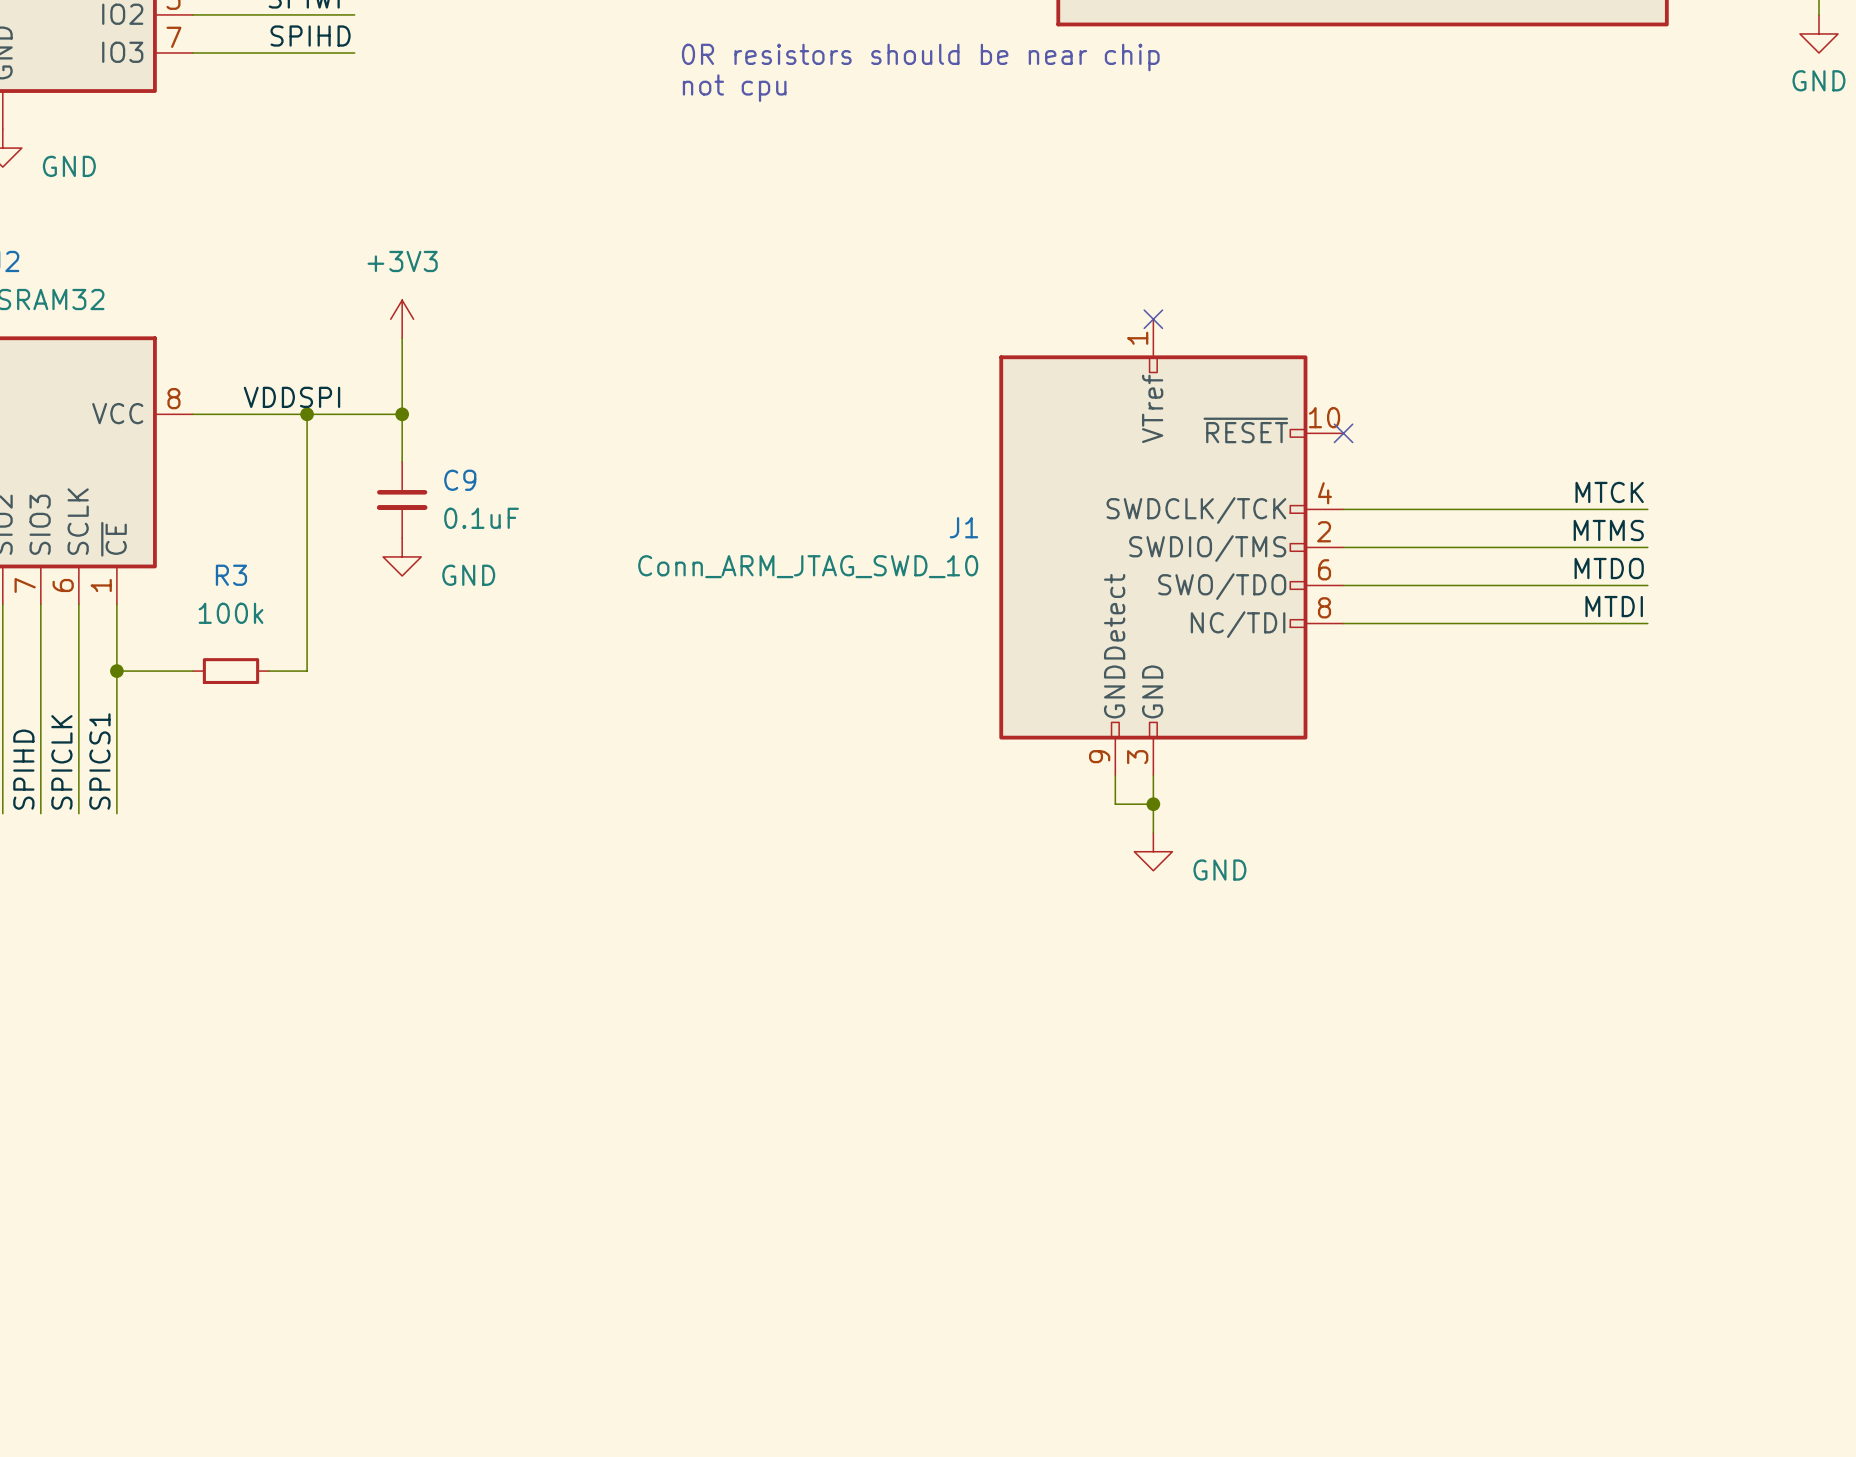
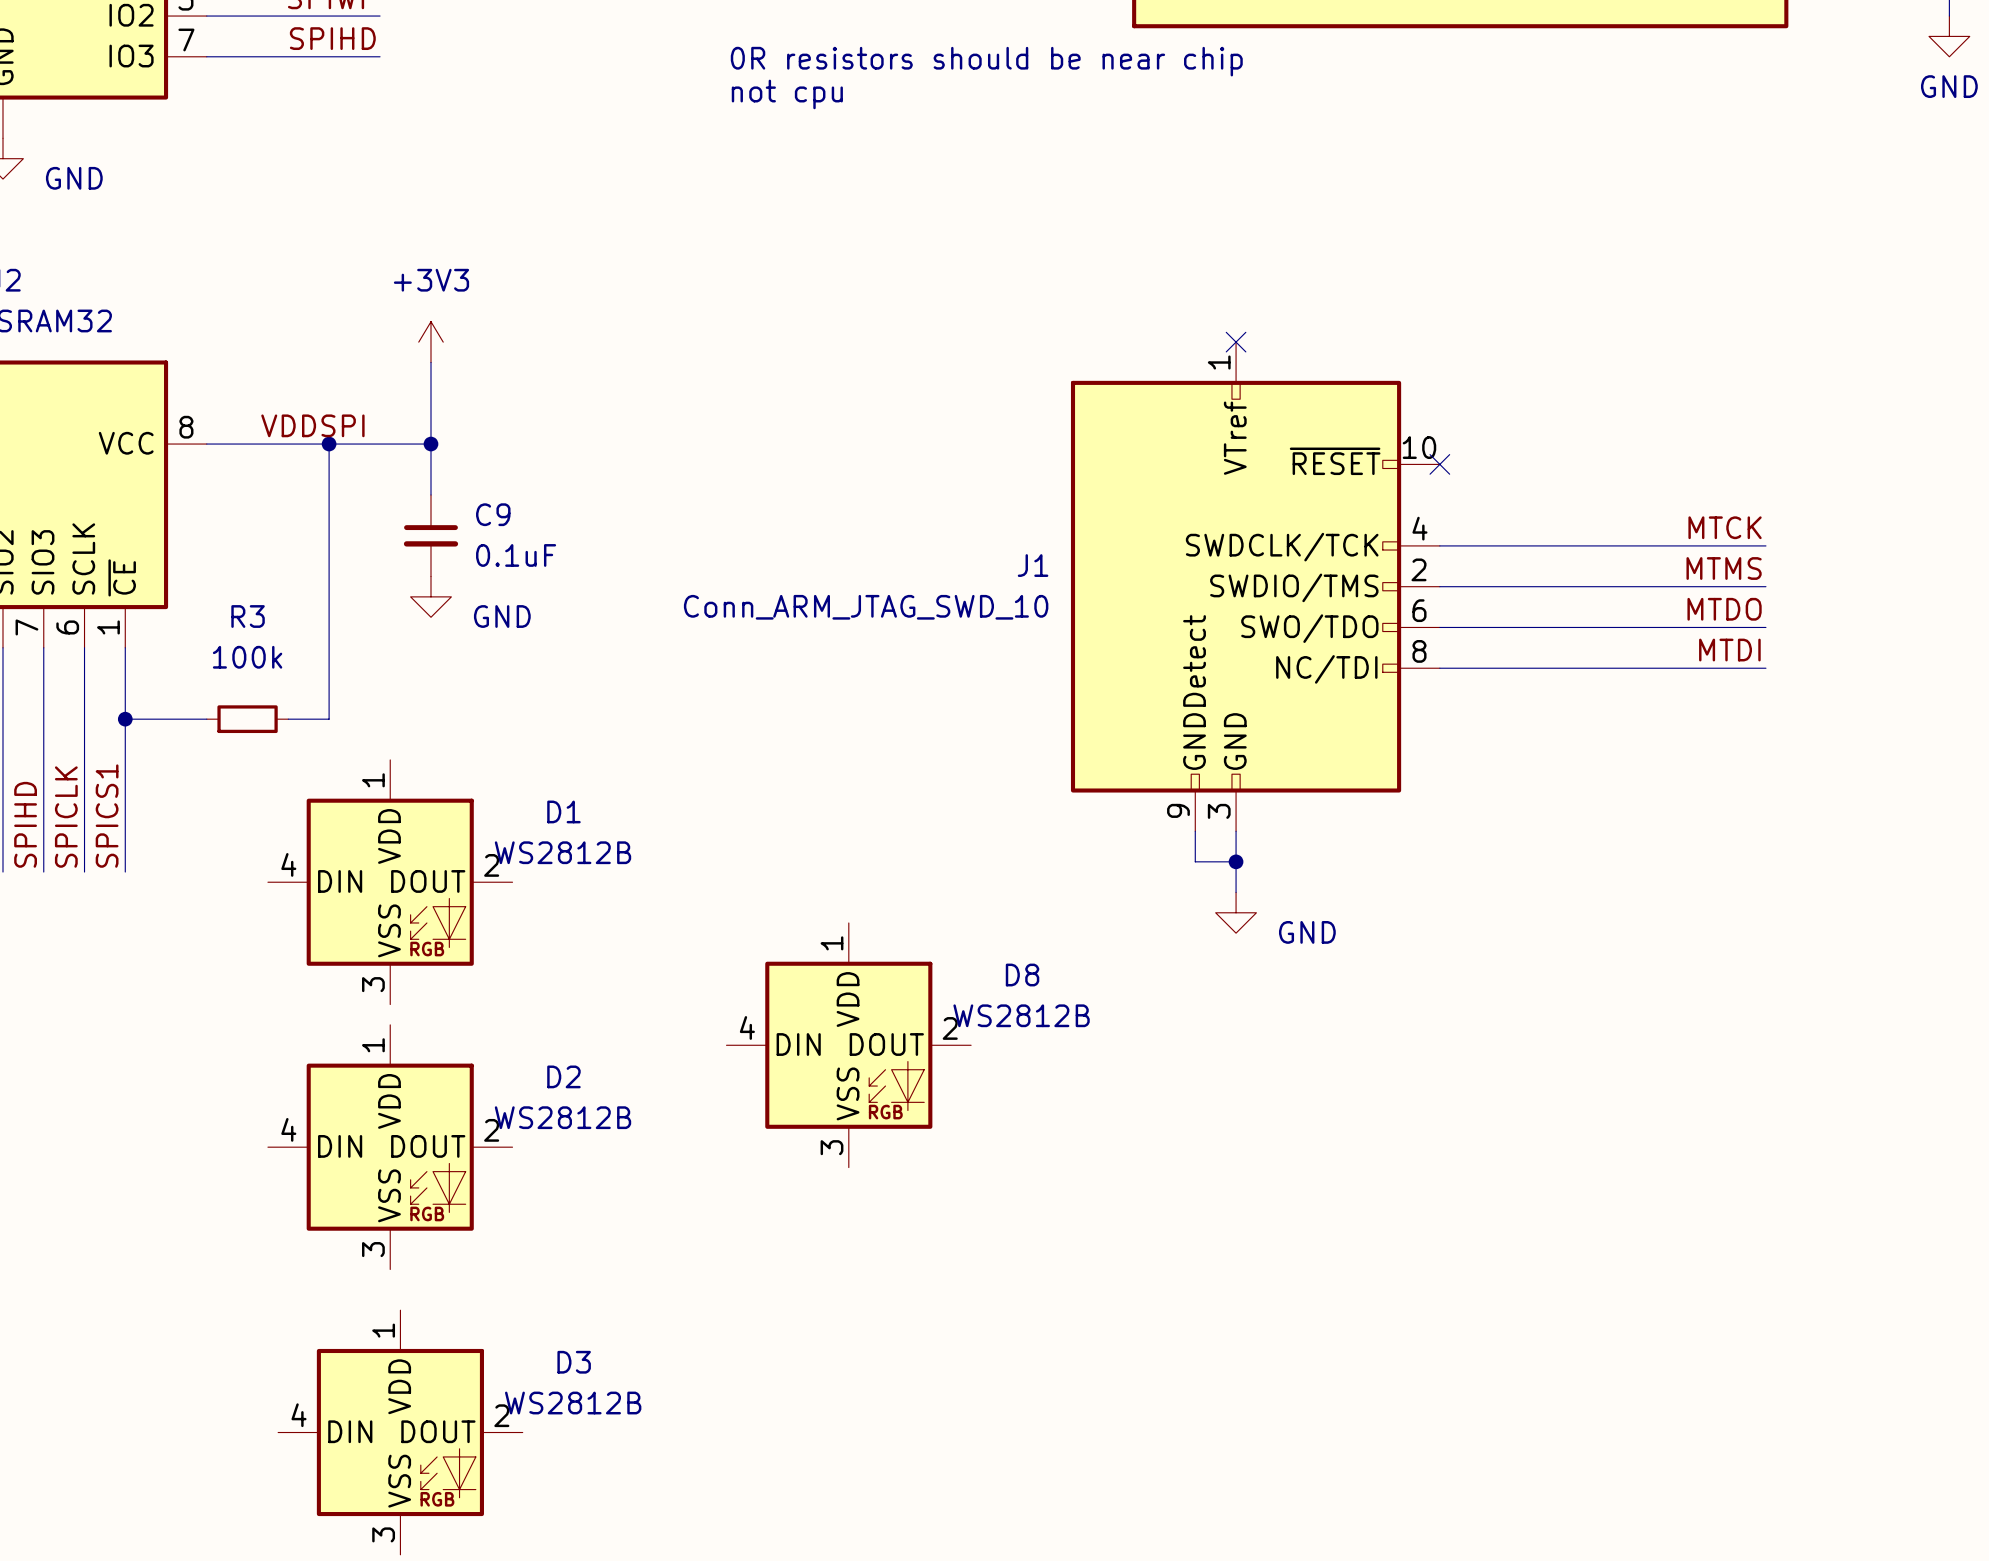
D1: none -> WS2812B (390, 882)
D8: none -> WS2812B (848, 1045)
D2: none -> WS2812B (390, 1147)
D3: none -> WS2812B (400, 1432)

